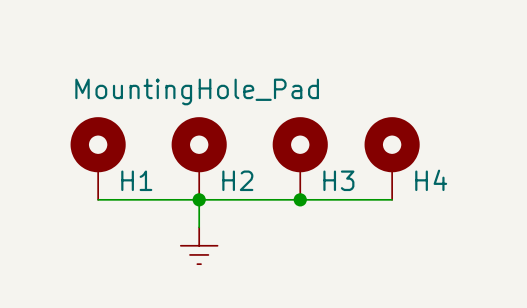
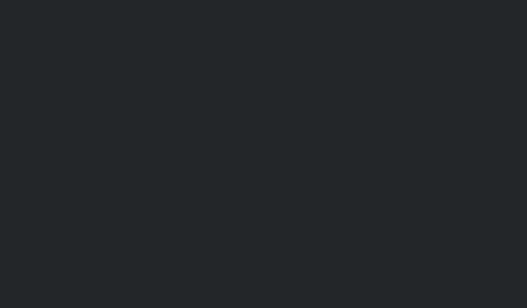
H1: MountingHole_Pad (98, 158) -> none
H2: (199, 158) -> none
H3: (300, 158) -> none
H4: (392, 158) -> none
wire: (98, 199) (392, 199) -> none
wire: (199, 199) (199, 227) -> none
junction: (199, 199) -> none
junction: (300, 199) -> none
power symbol: (199, 245) -> none

